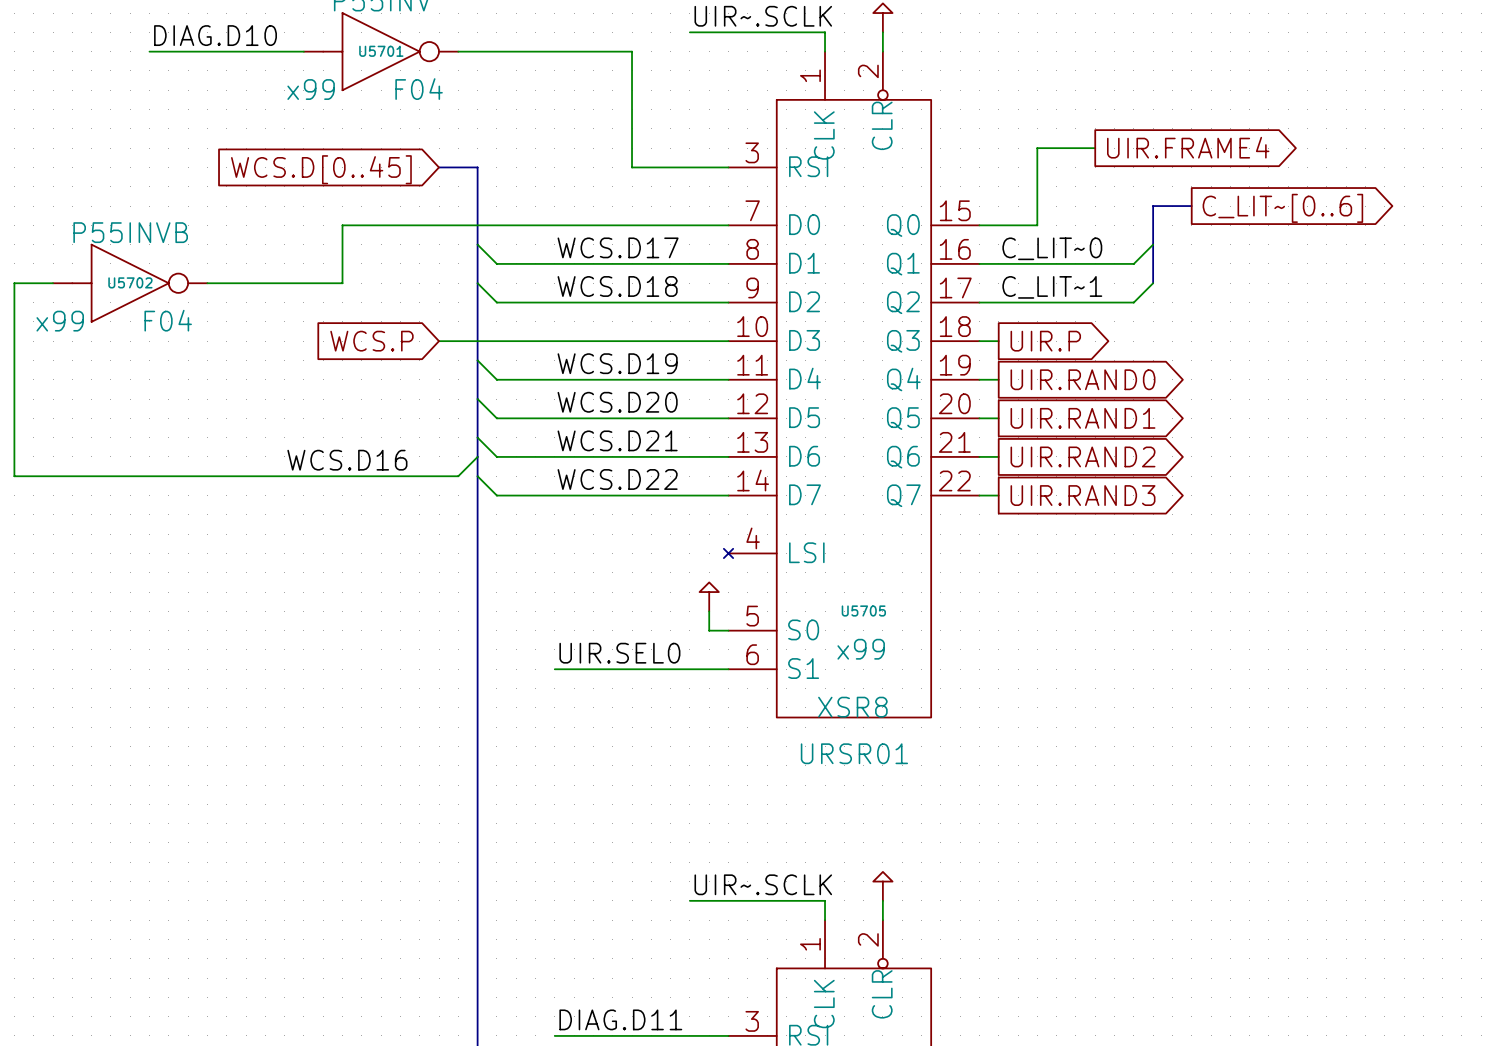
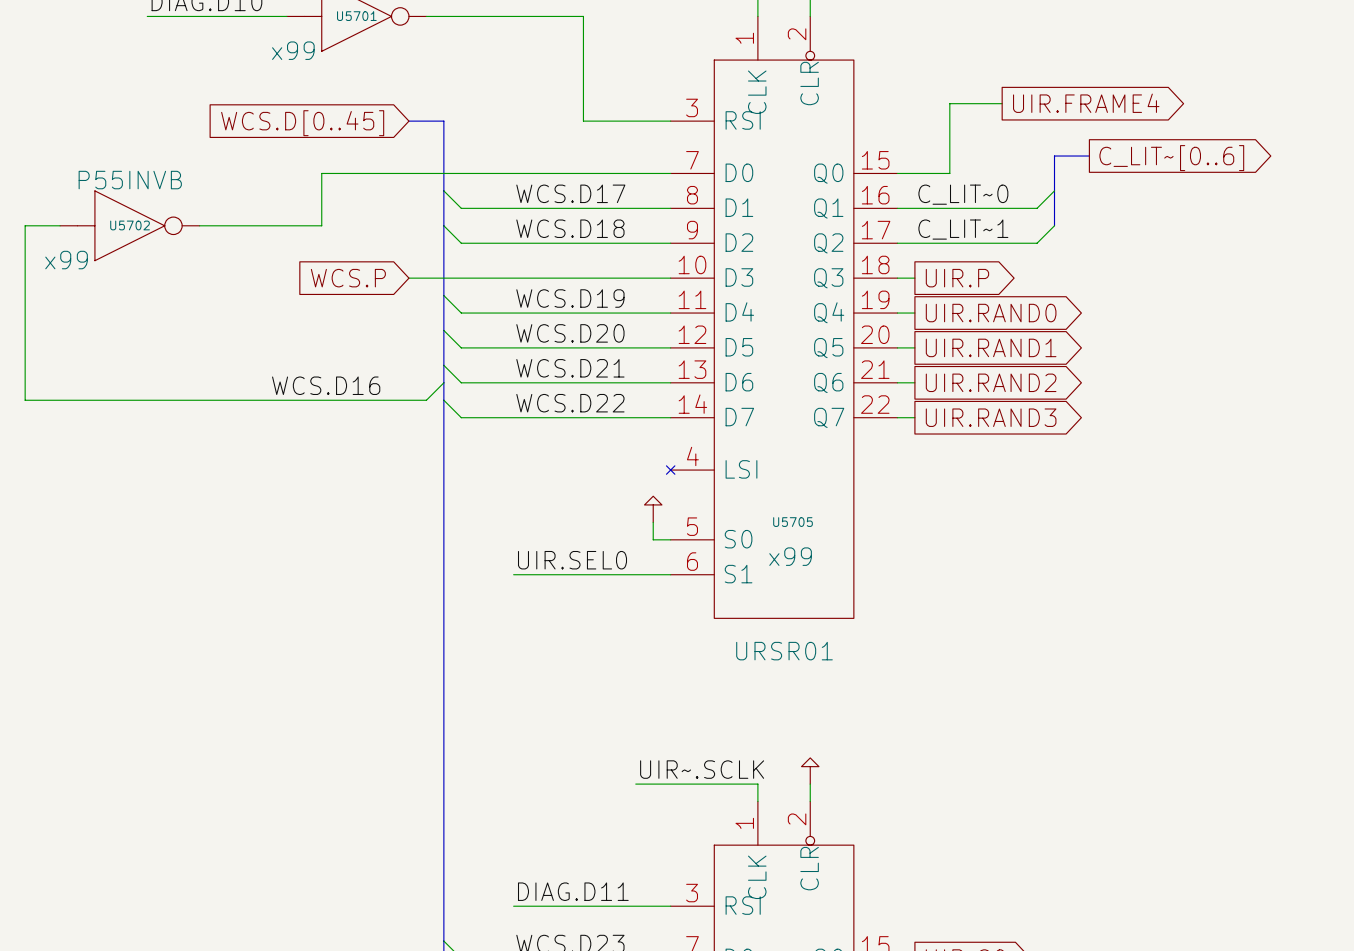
U5701 value: F04 (419, 89) -> none
U5702 value: F04 (168, 320) -> none
U5705 value: XSR8 (852, 707) -> none

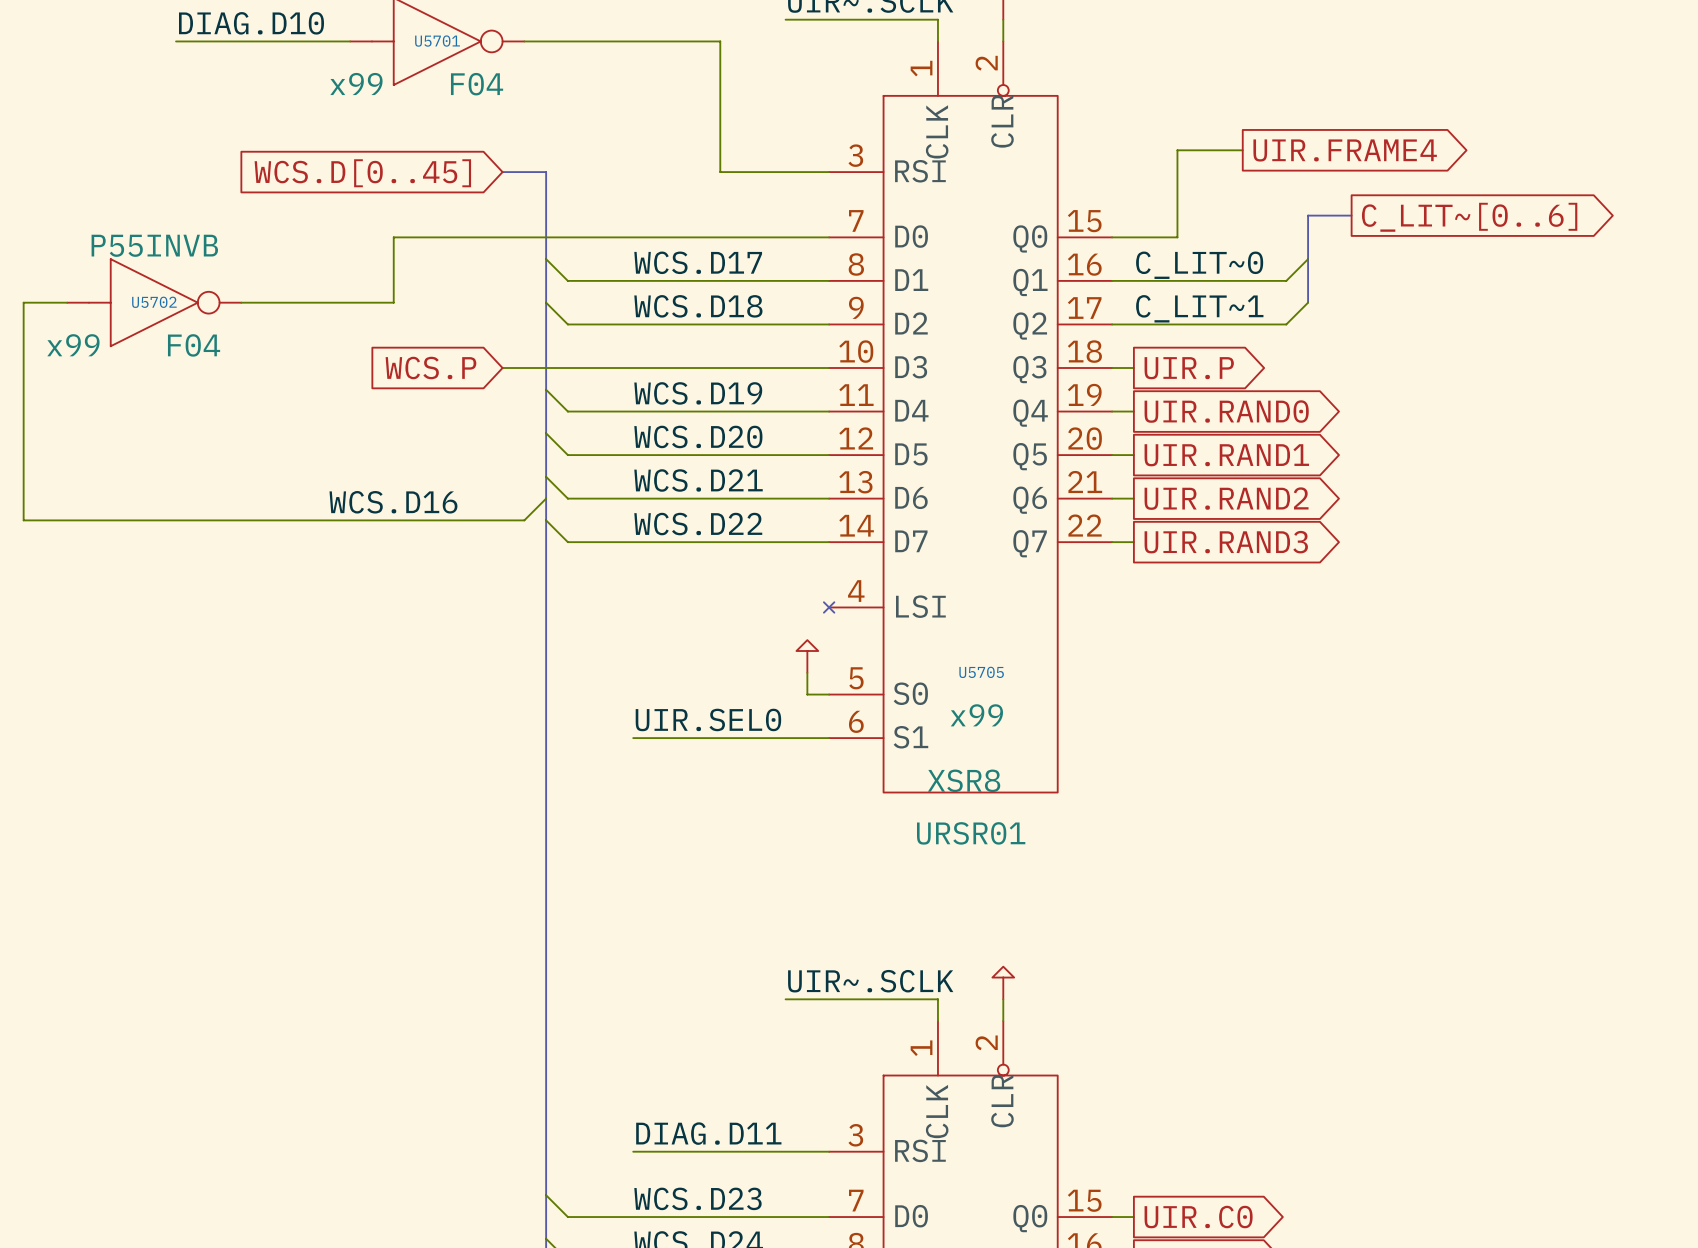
U5701 value: none -> F04 (477, 84)
U5702 value: none -> F04 (194, 345)
U5705 value: none -> XSR8 (964, 780)

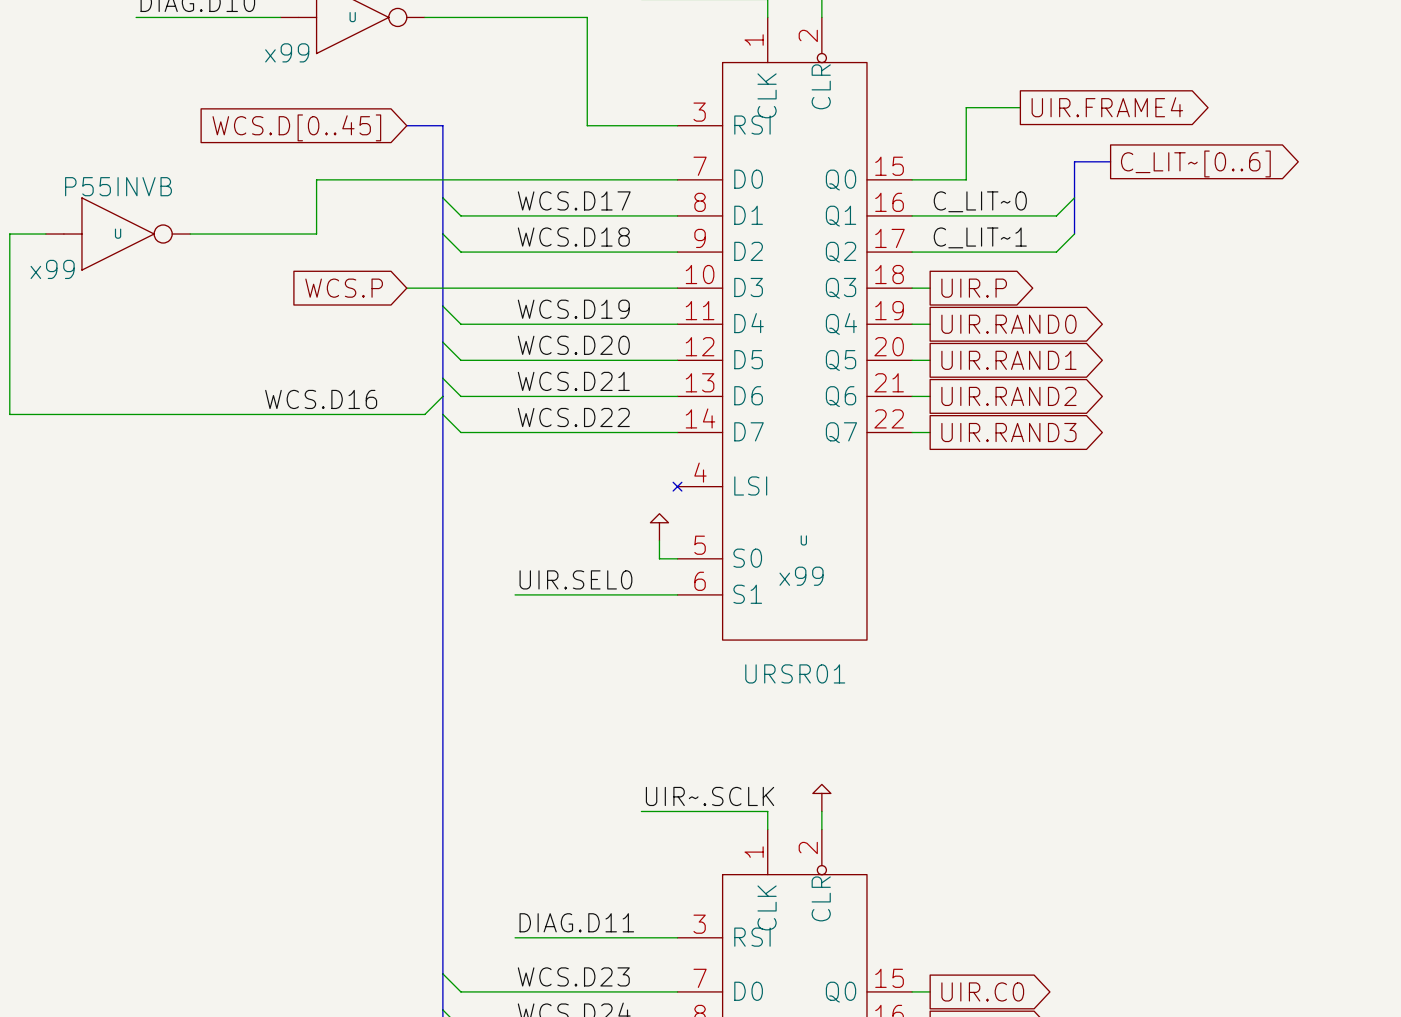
U5701 name: U5701 (437, 41) -> U (352, 17)
U5701 value: F04 (477, 84) -> none
U5702 name: U5702 (154, 302) -> U (118, 233)
U5702 value: F04 (194, 345) -> none
U5705 name: U5705 (981, 672) -> U (803, 540)
U5705 value: XSR8 (964, 780) -> none

